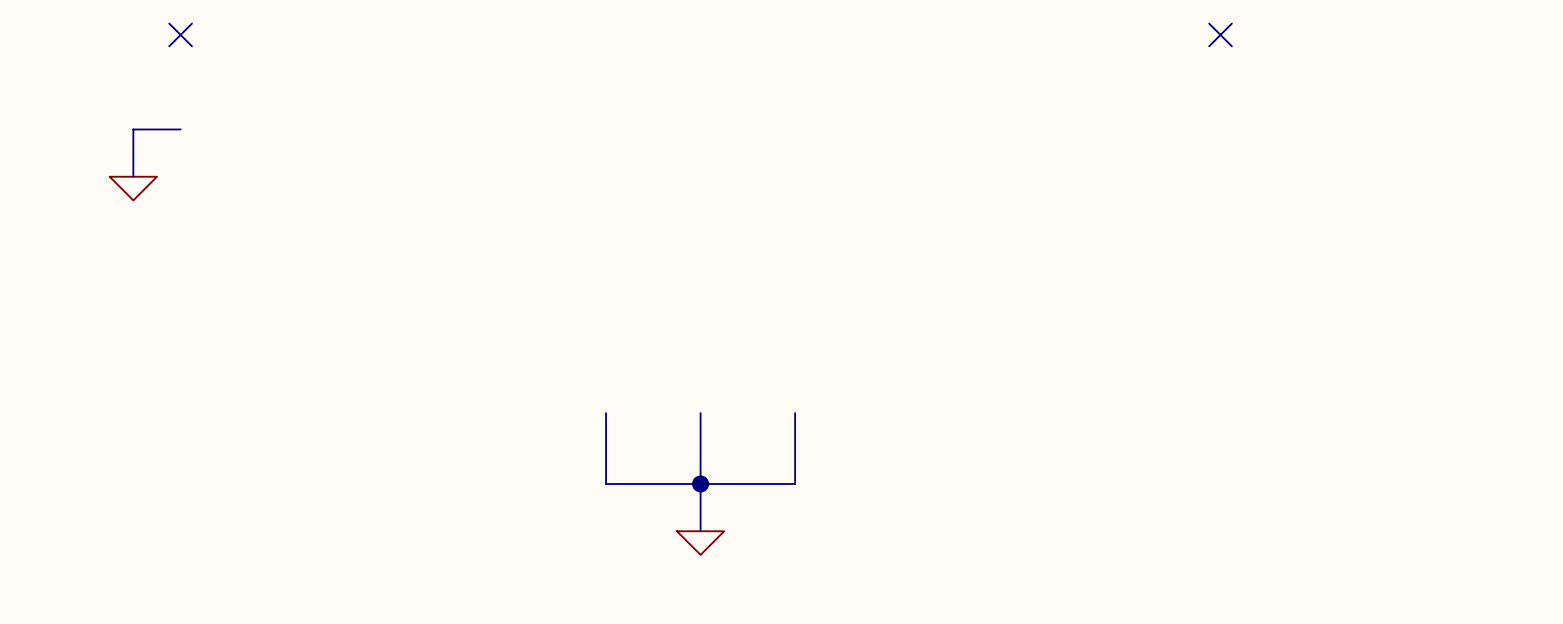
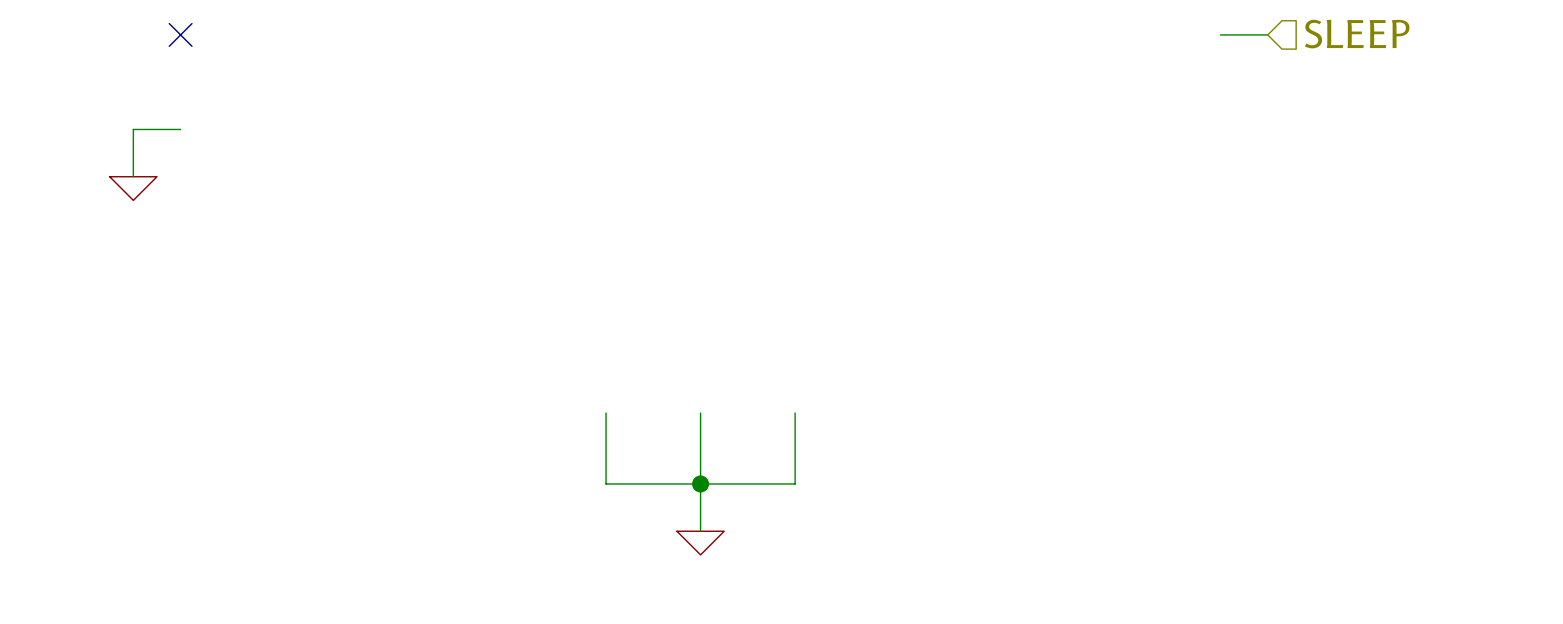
hierarchical label: none -> SLEEP (1357, 34)
wire: none -> (1220, 34) (1267, 34)
no-connect mark: (1220, 34) -> none

